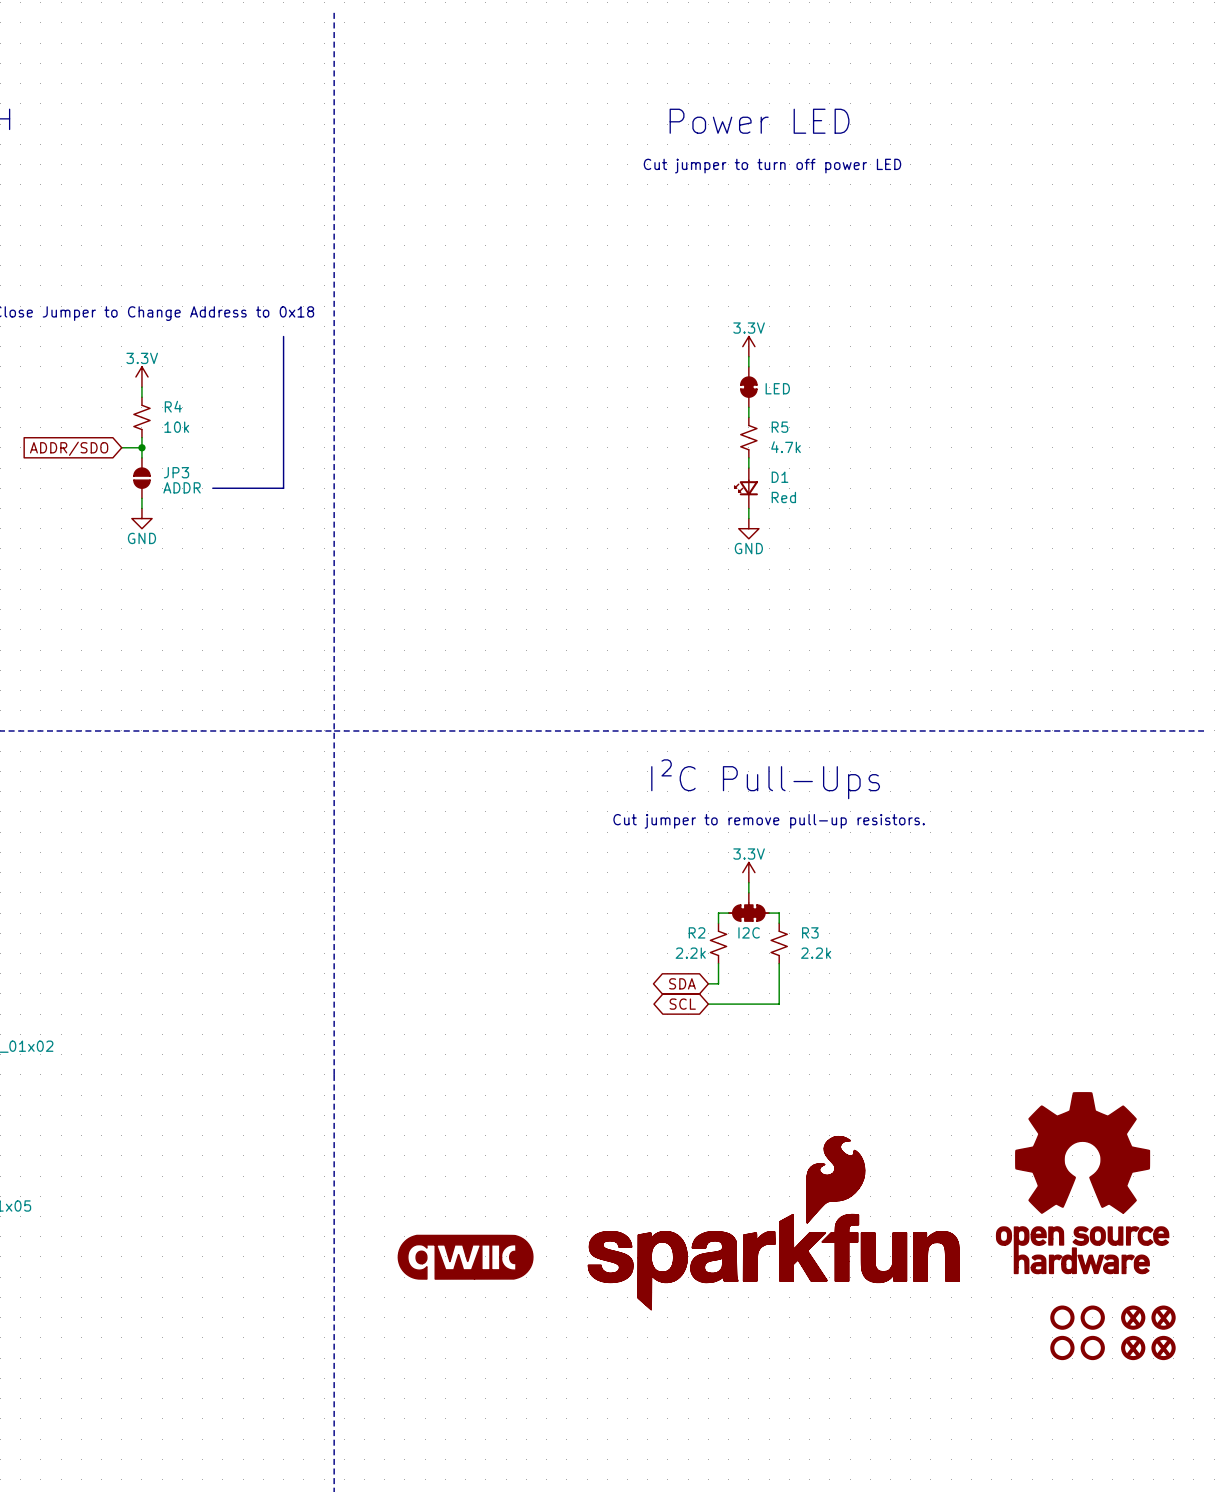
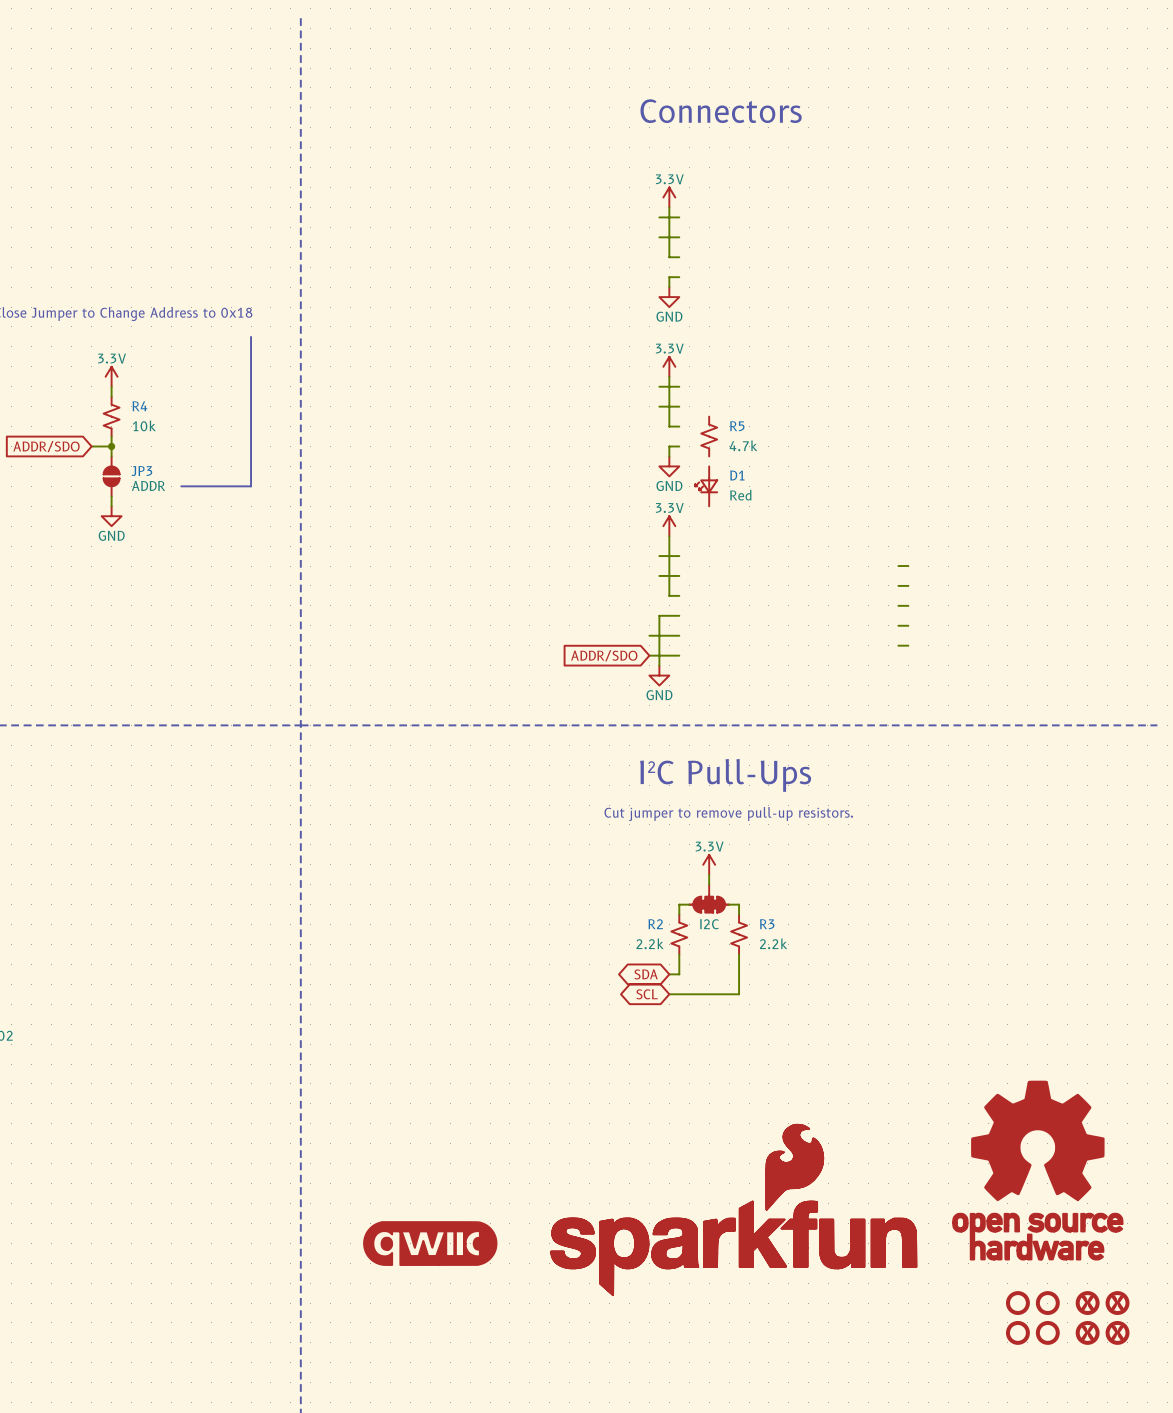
text: none -> Connectors (721, 111)
text: Power LED (759, 121) -> none
text: Cut jumper to turn off power LED (772, 166) -> none
power symbol: none -> 3.3V (669, 197)
wire: none -> (669, 207) (669, 257) (679, 257)
wire: none -> (659, 217) (679, 217)
wire: none -> (659, 237) (679, 237)
wire: none -> (679, 277) (669, 277) (669, 287)
power symbol: none -> GND (669, 297)
power symbol position: 3.3V (748, 346) -> 3.3V (669, 366)
wire: (748, 356) (748, 366) -> none
wire: none -> (669, 376) (669, 426) (679, 426)
wire: none -> (659, 386) (679, 386)
part: LED (748, 387) -> none
wire: none -> (659, 406) (679, 406)
wire: (748, 407) (748, 417) -> none
wire: none -> (679, 446) (669, 446) (669, 456)
wire: (748, 457) (748, 468) -> none
wire: (748, 508) (748, 518) -> none
power symbol: none -> 3.3V (669, 526)
power symbol position: GND (748, 528) -> GND (669, 466)
wire: none -> (669, 536) (669, 595) (679, 595)
wire: none -> (659, 556) (679, 556)
wire: none -> (898, 566) (908, 566)
wire: none -> (659, 575) (679, 575)
wire: none -> (898, 585) (908, 585)
wire: none -> (898, 605) (908, 605)
wire: none -> (679, 615) (659, 615) (659, 665)
wire: none -> (898, 625) (908, 625)
wire: none -> (649, 635) (679, 635)
wire: none -> (898, 645) (908, 645)
wire: none -> (649, 655) (679, 655)
global label: none -> ADDR/SDO (604, 655)
power symbol: none -> GND (659, 675)

